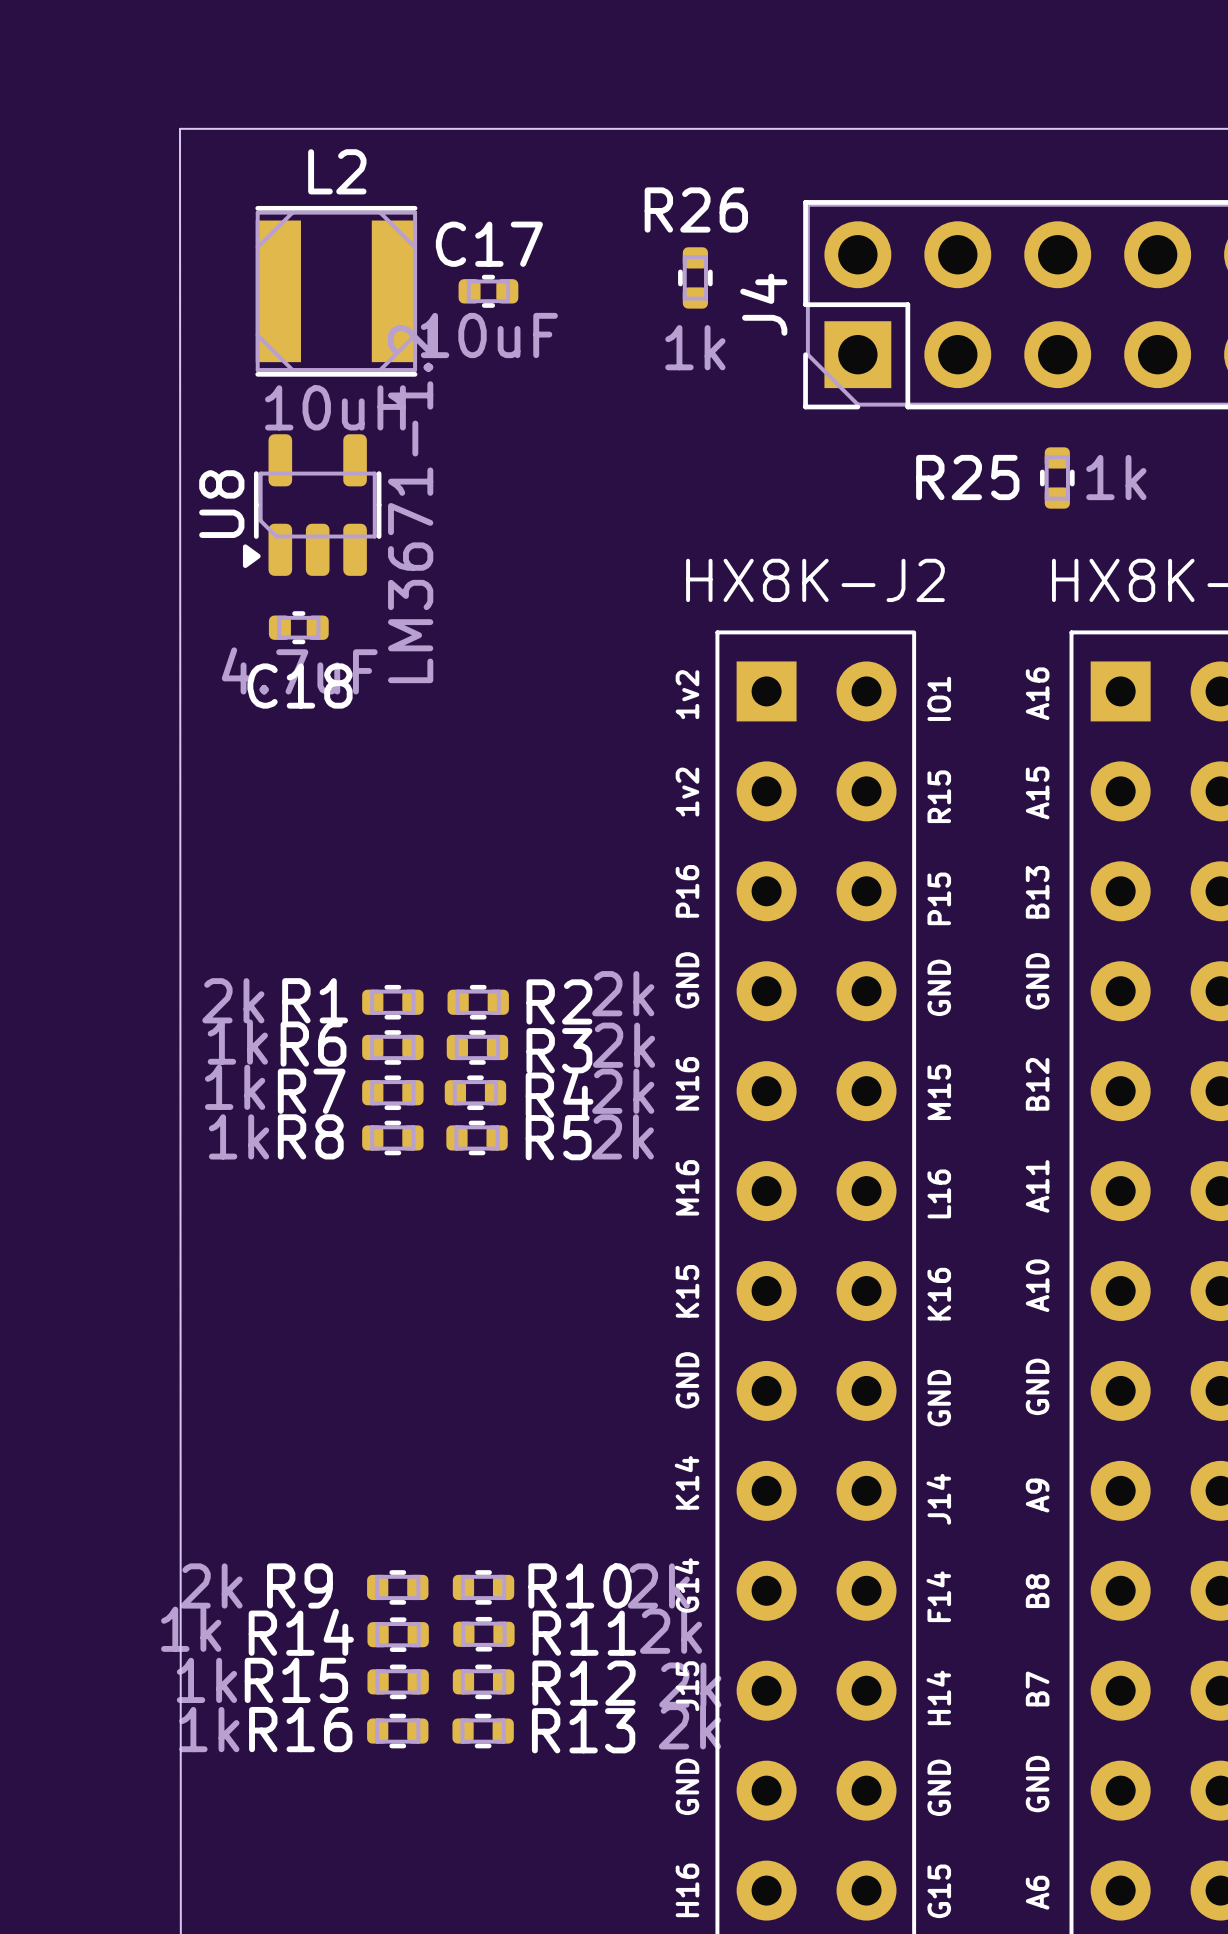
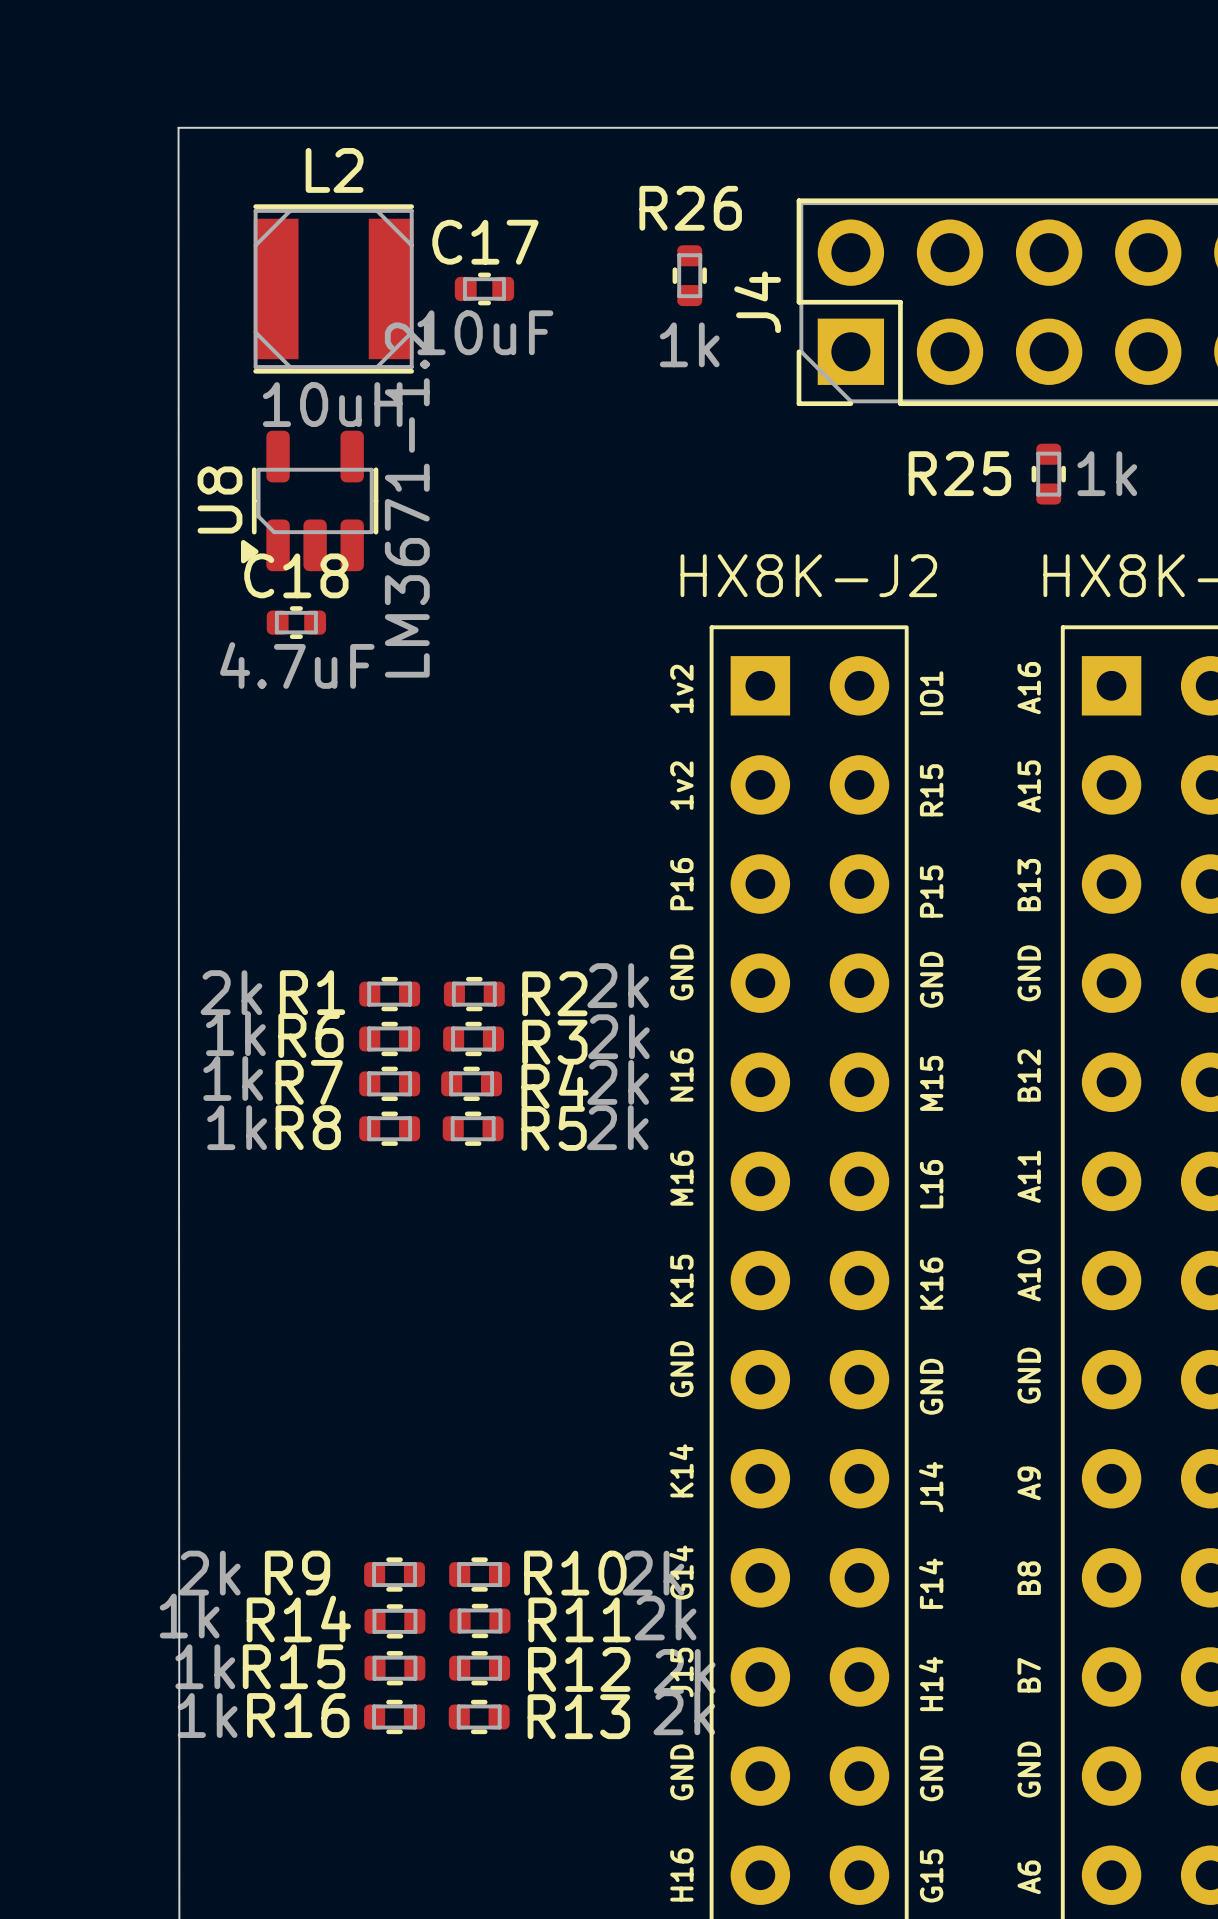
C18 name position: C18 (300, 686) -> C18 (296, 575)

